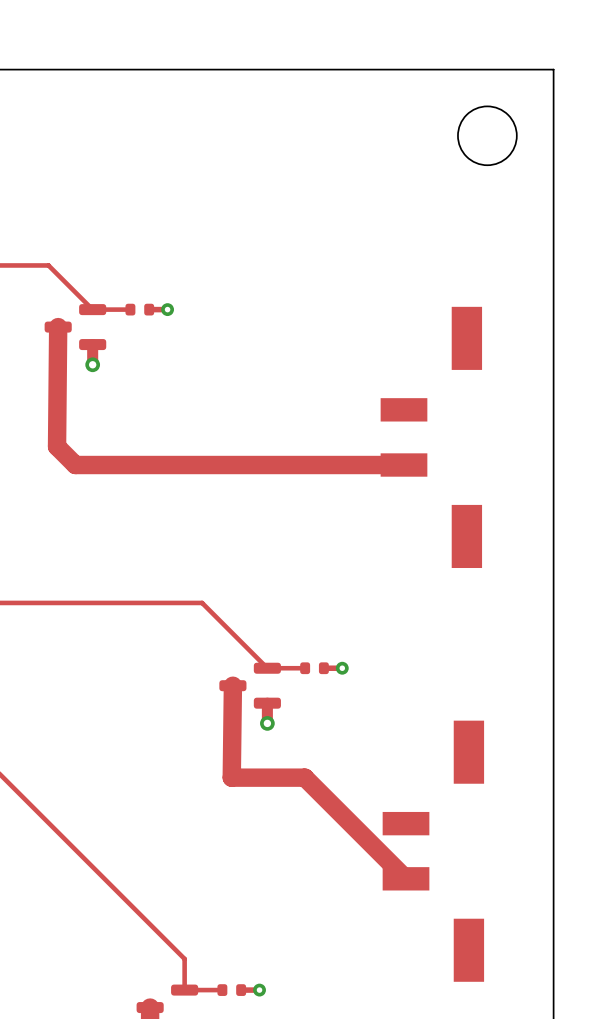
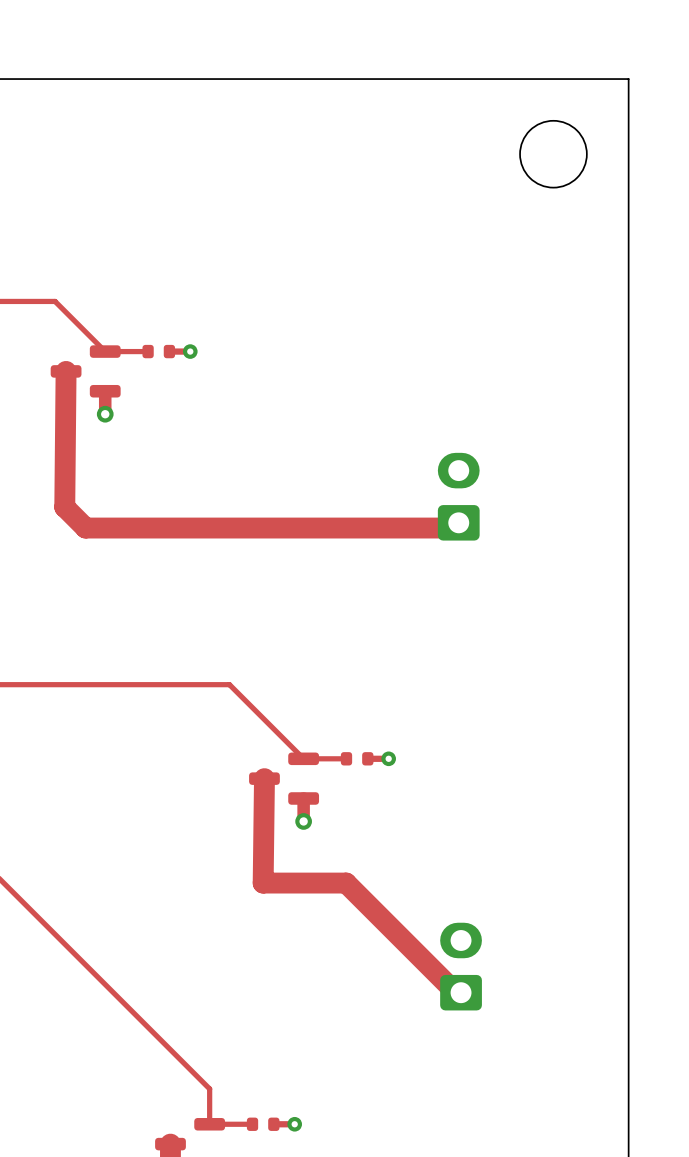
part: none -> (458, 496)
part: (431, 437) -> none
part: none -> (461, 966)
part: (433, 851) -> none

